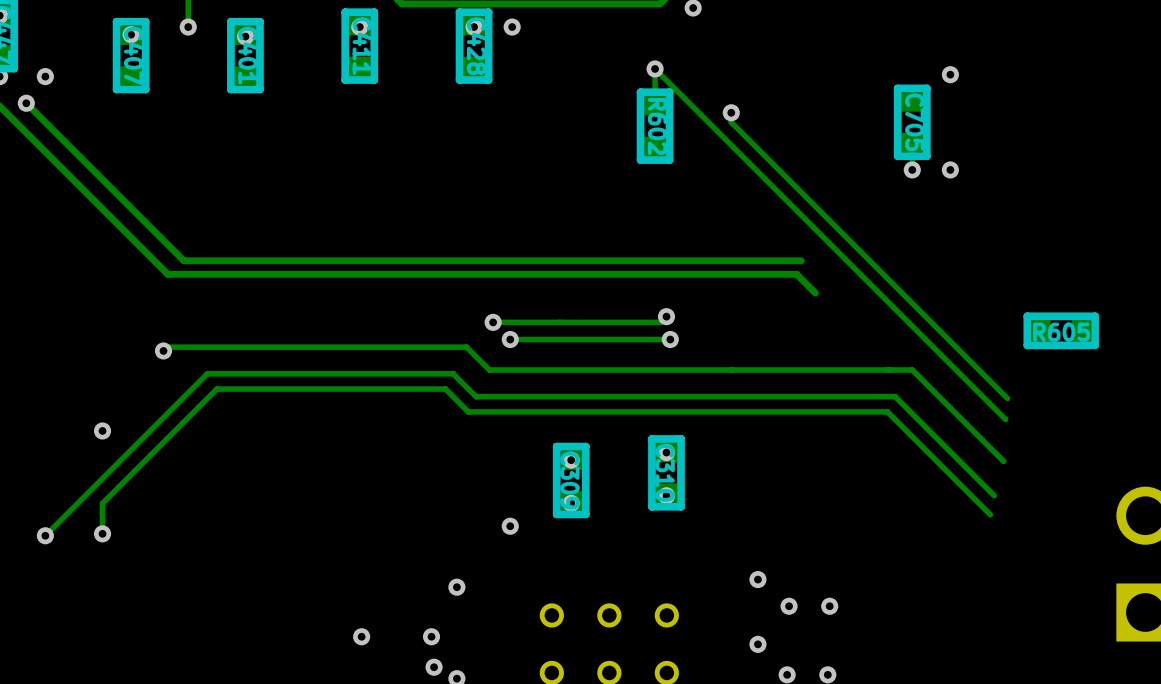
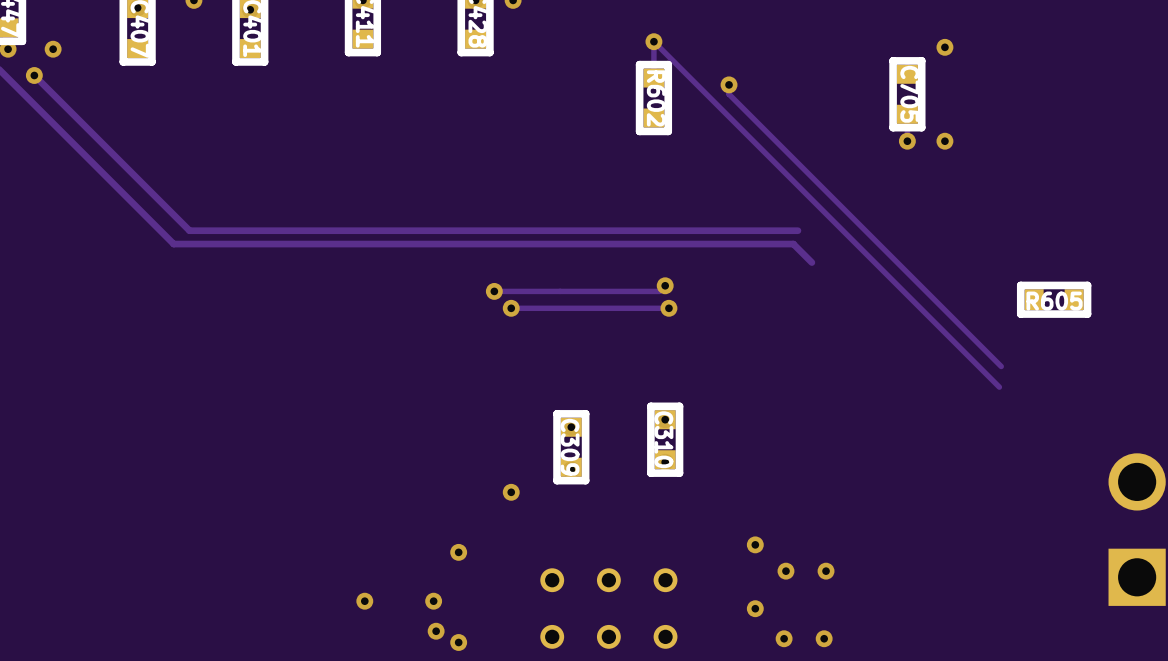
track: (163, 350) (167, 347) (466, 347) (489, 370) (912, 370) (1003, 461) -> none
via: (163, 350) -> none
via: (102, 430) -> none
track: (994, 495) (895, 396) (475, 396) (453, 373) (207, 373) (45, 535) -> none
track: (990, 514) (887, 411) (468, 411) (445, 389) (216, 389) (102, 503) (102, 533) -> none
via: (102, 533) -> none
via: (45, 535) -> none

